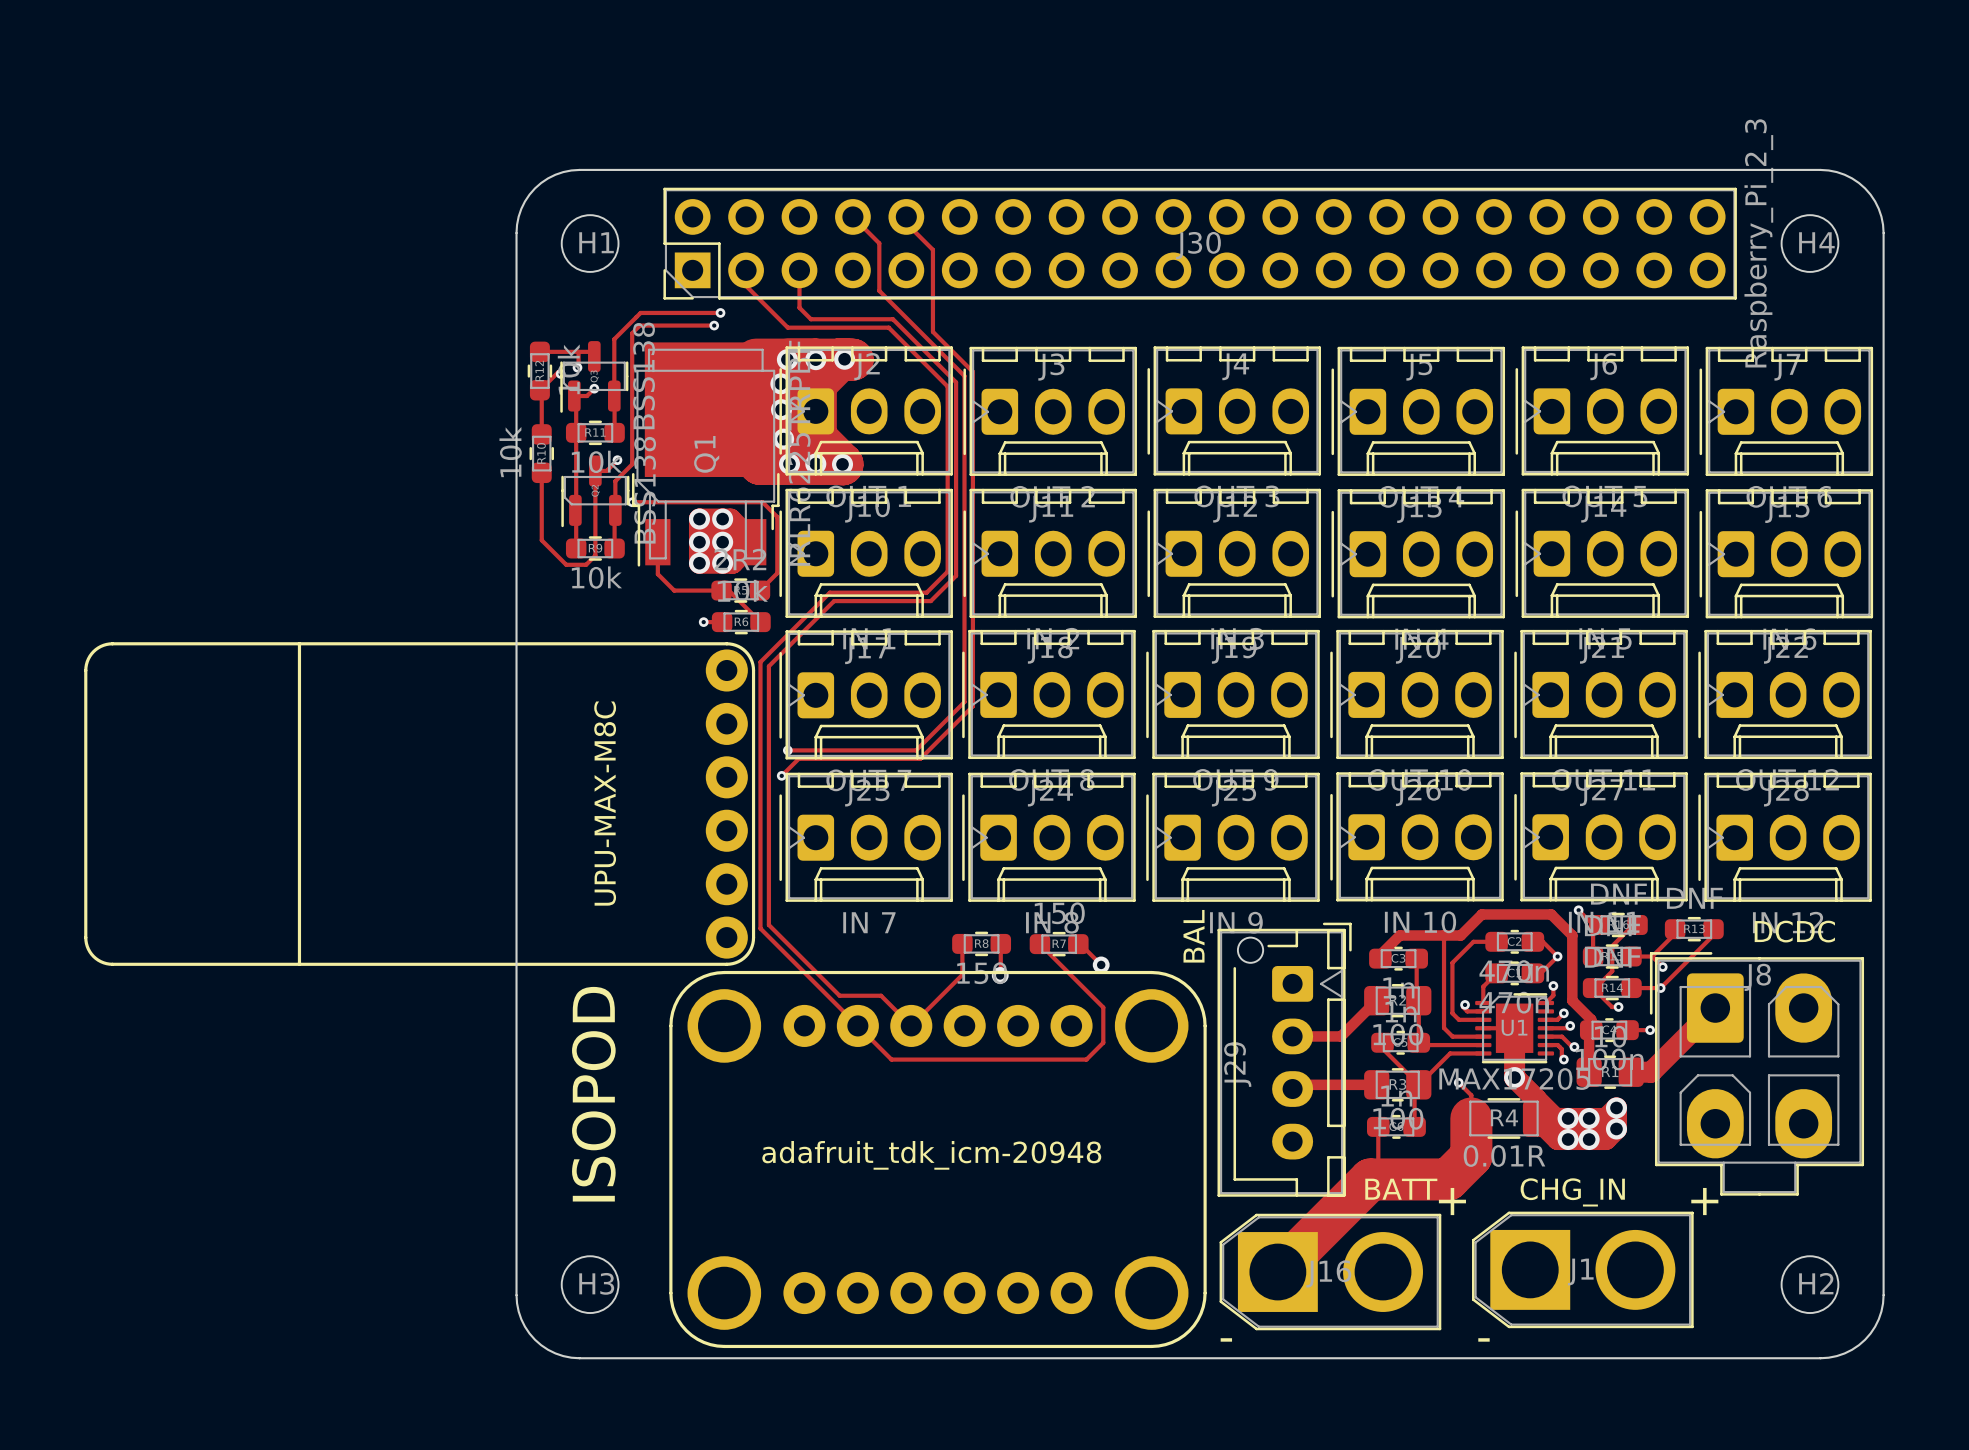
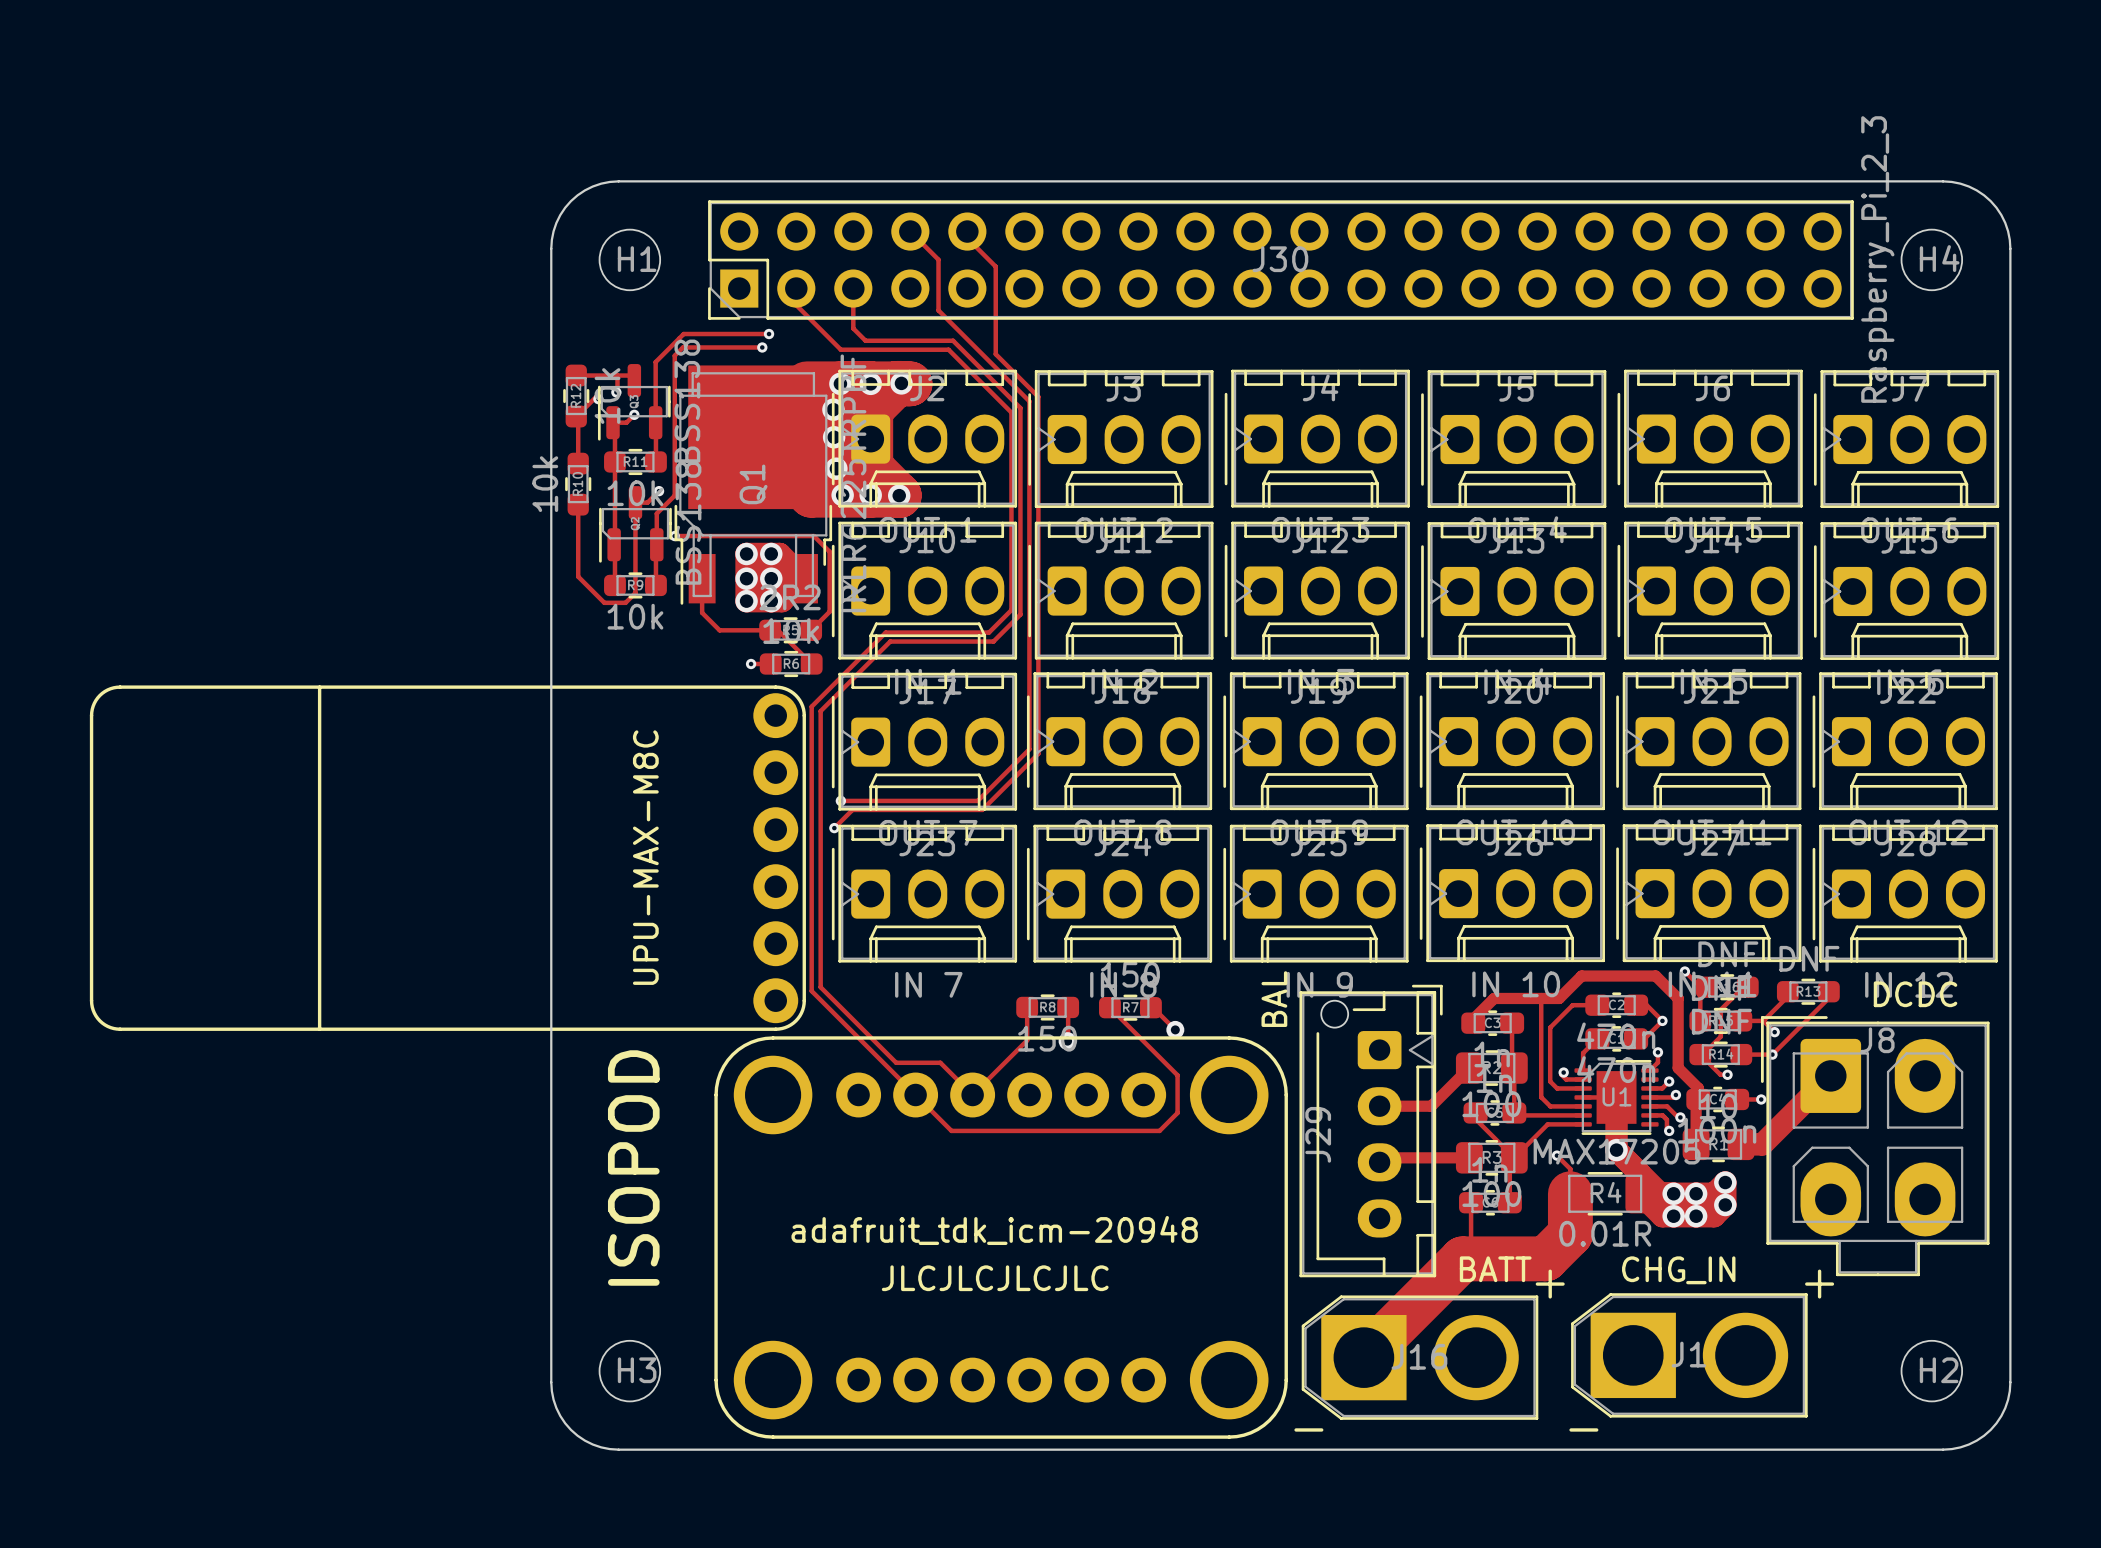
text: none -> JLCJLCJLCJLC (995, 1278)

